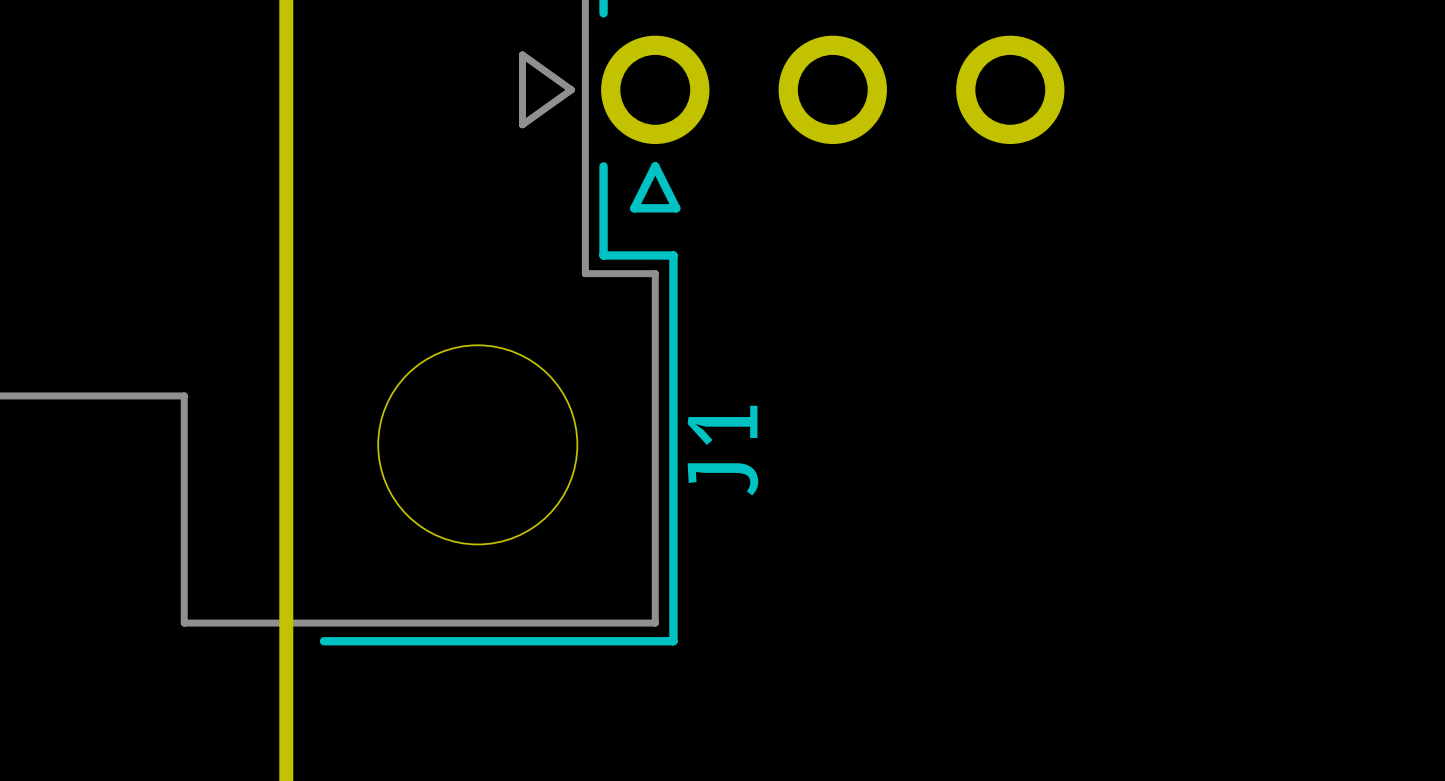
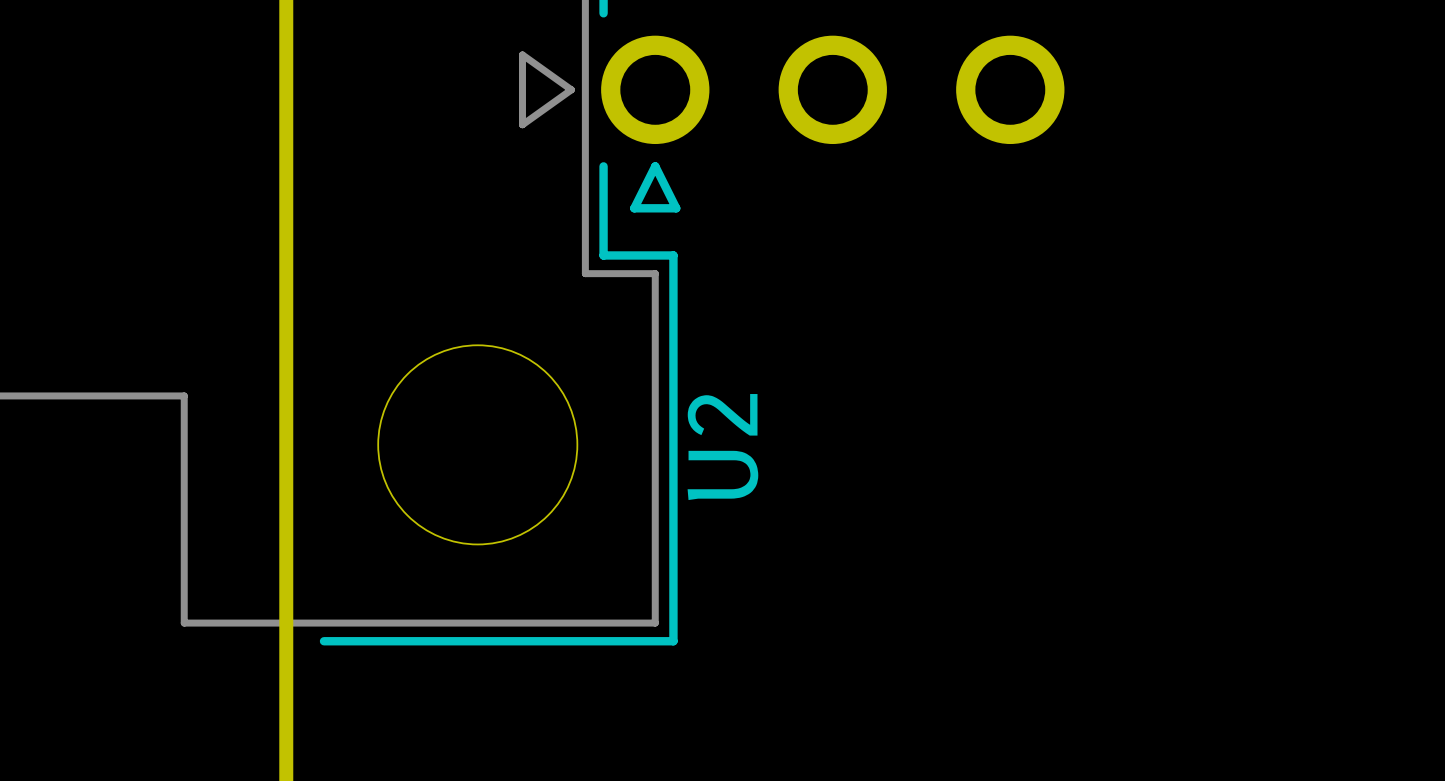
J1 name: J1 (722, 450) -> U2 (722, 447)

